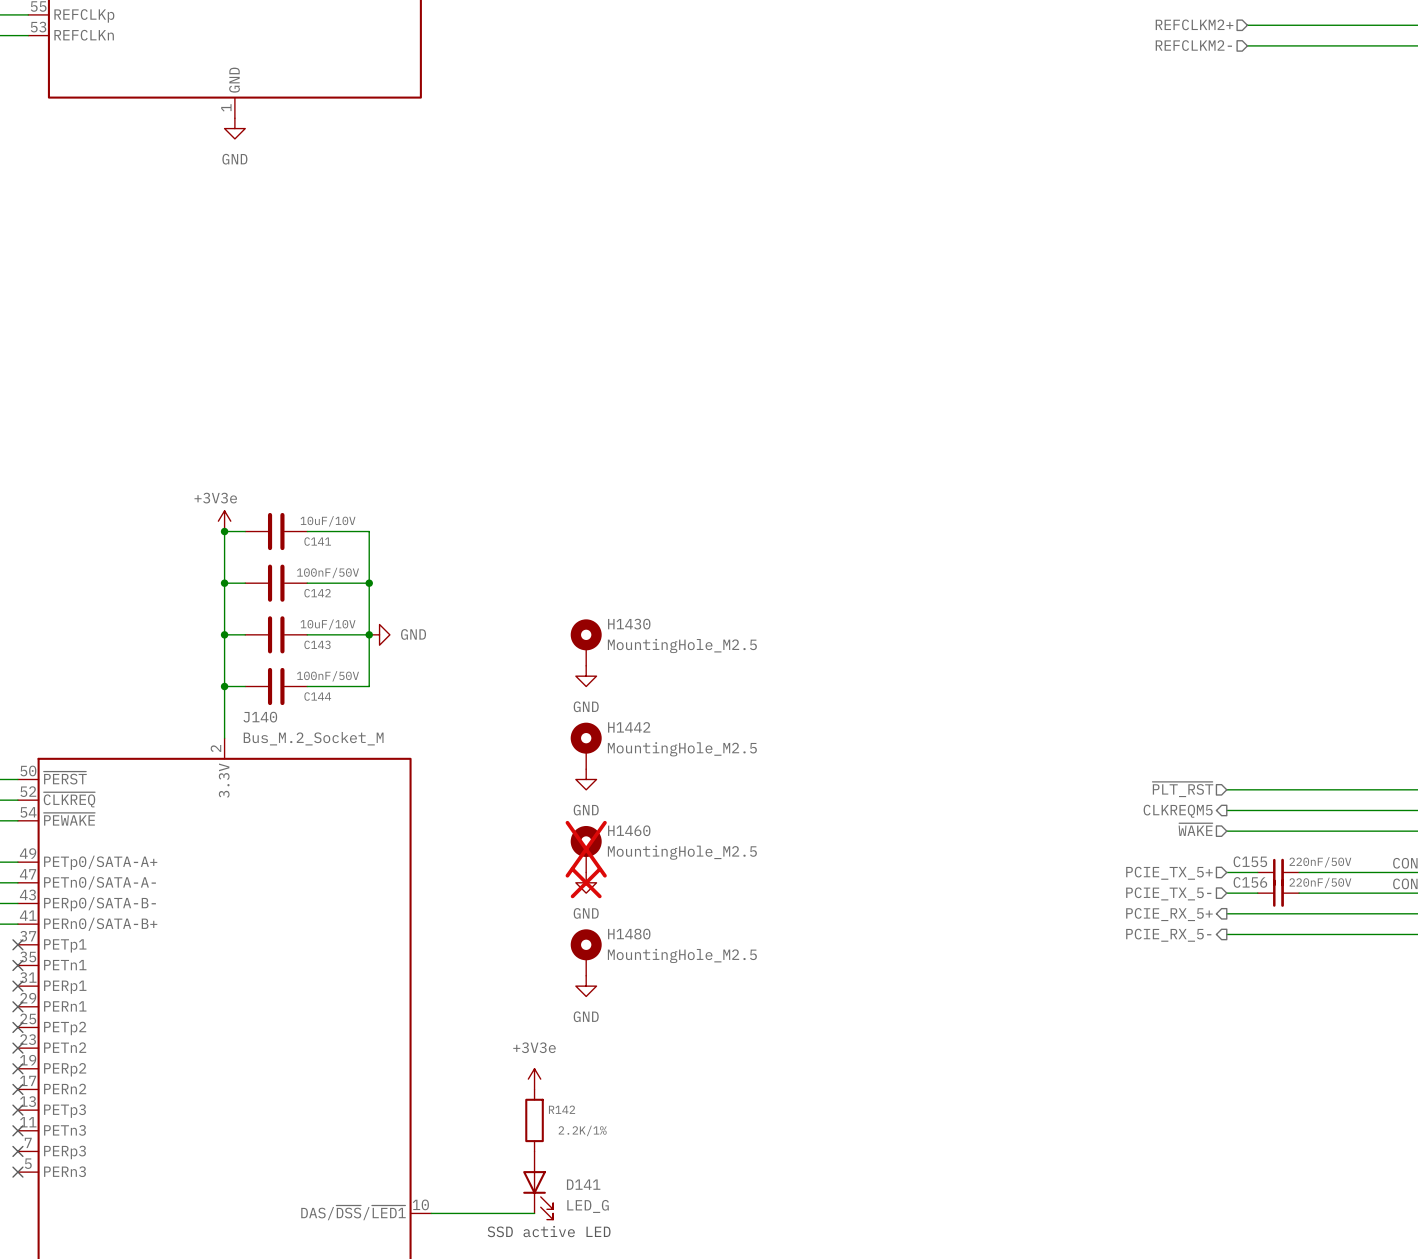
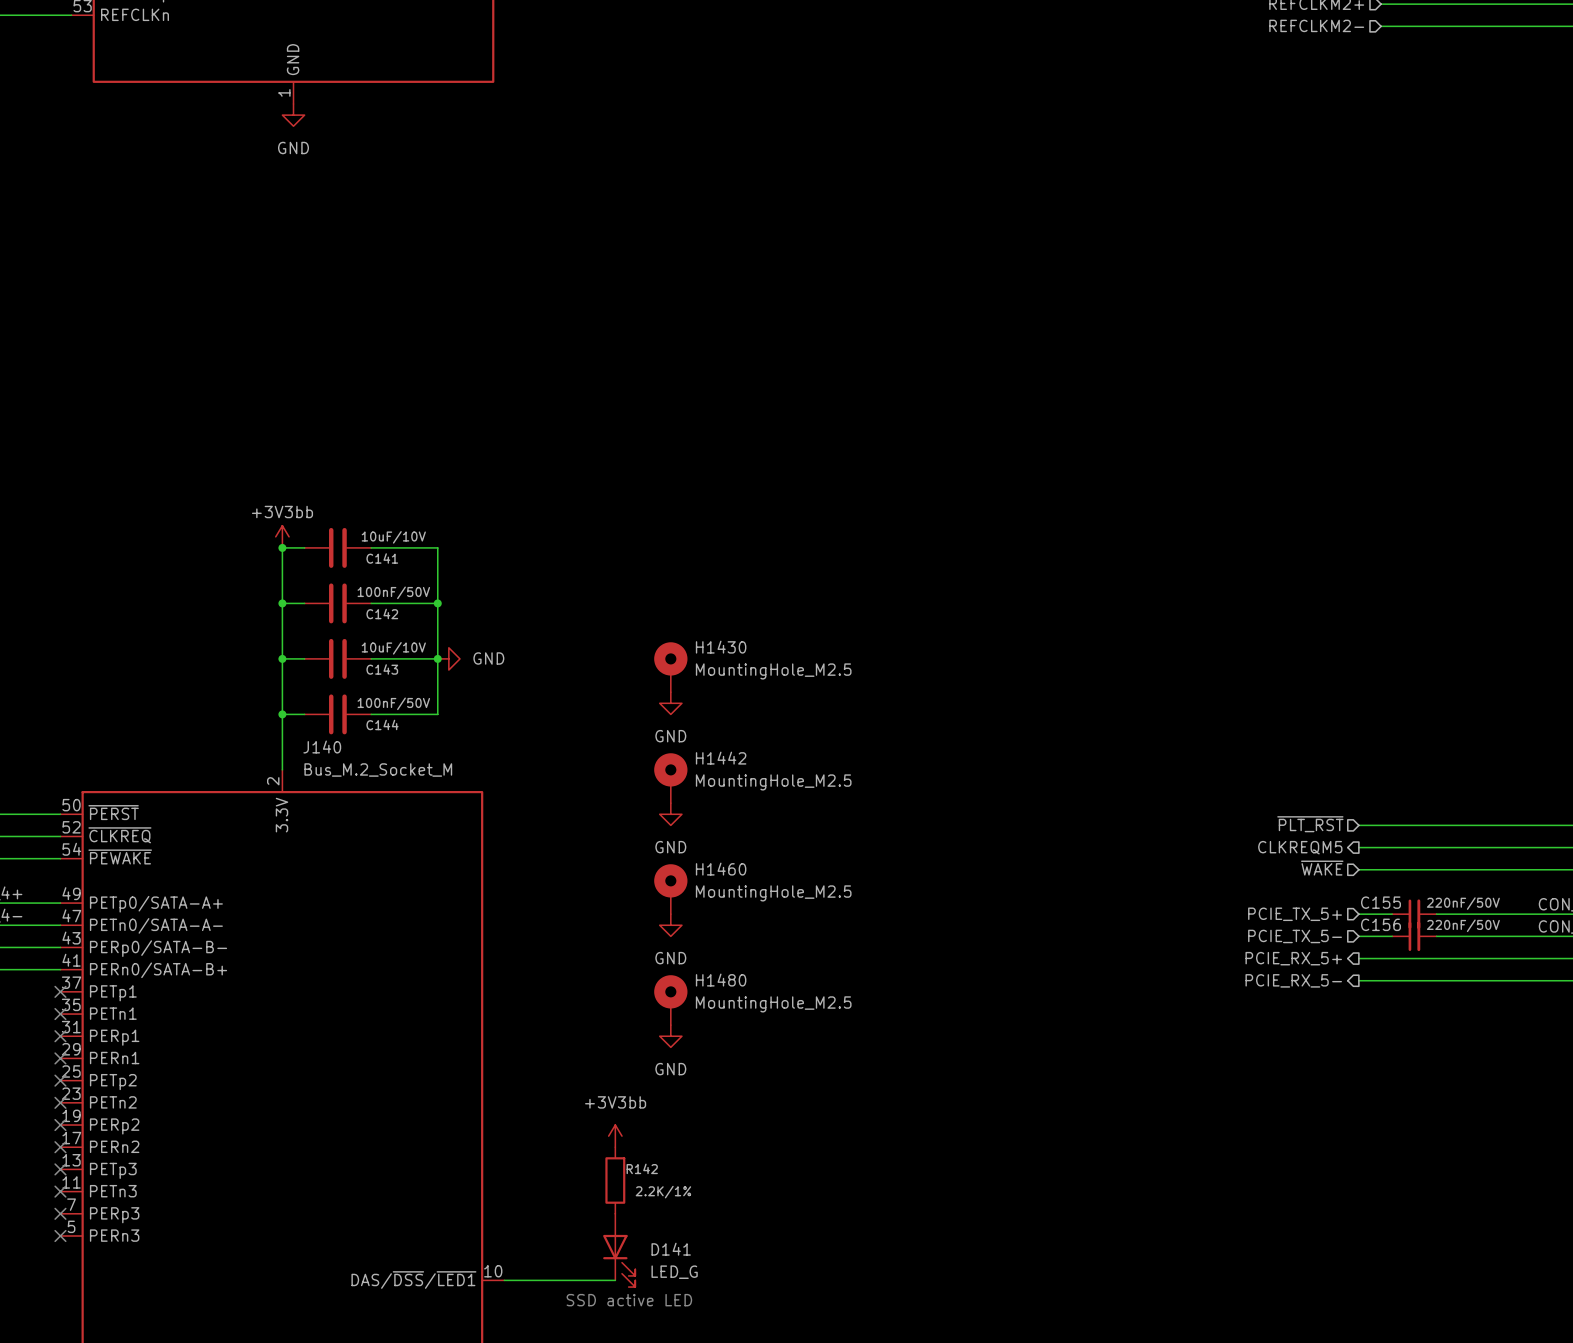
power symbol: +3V3e (224, 521) -> +3V3bb (282, 536)
H1460 do-not-place cross: (586, 849) -> none
power symbol do-not-place cross: (586, 882) -> none
power symbol: +3V3e (534, 1079) -> +3V3bb (615, 1136)

